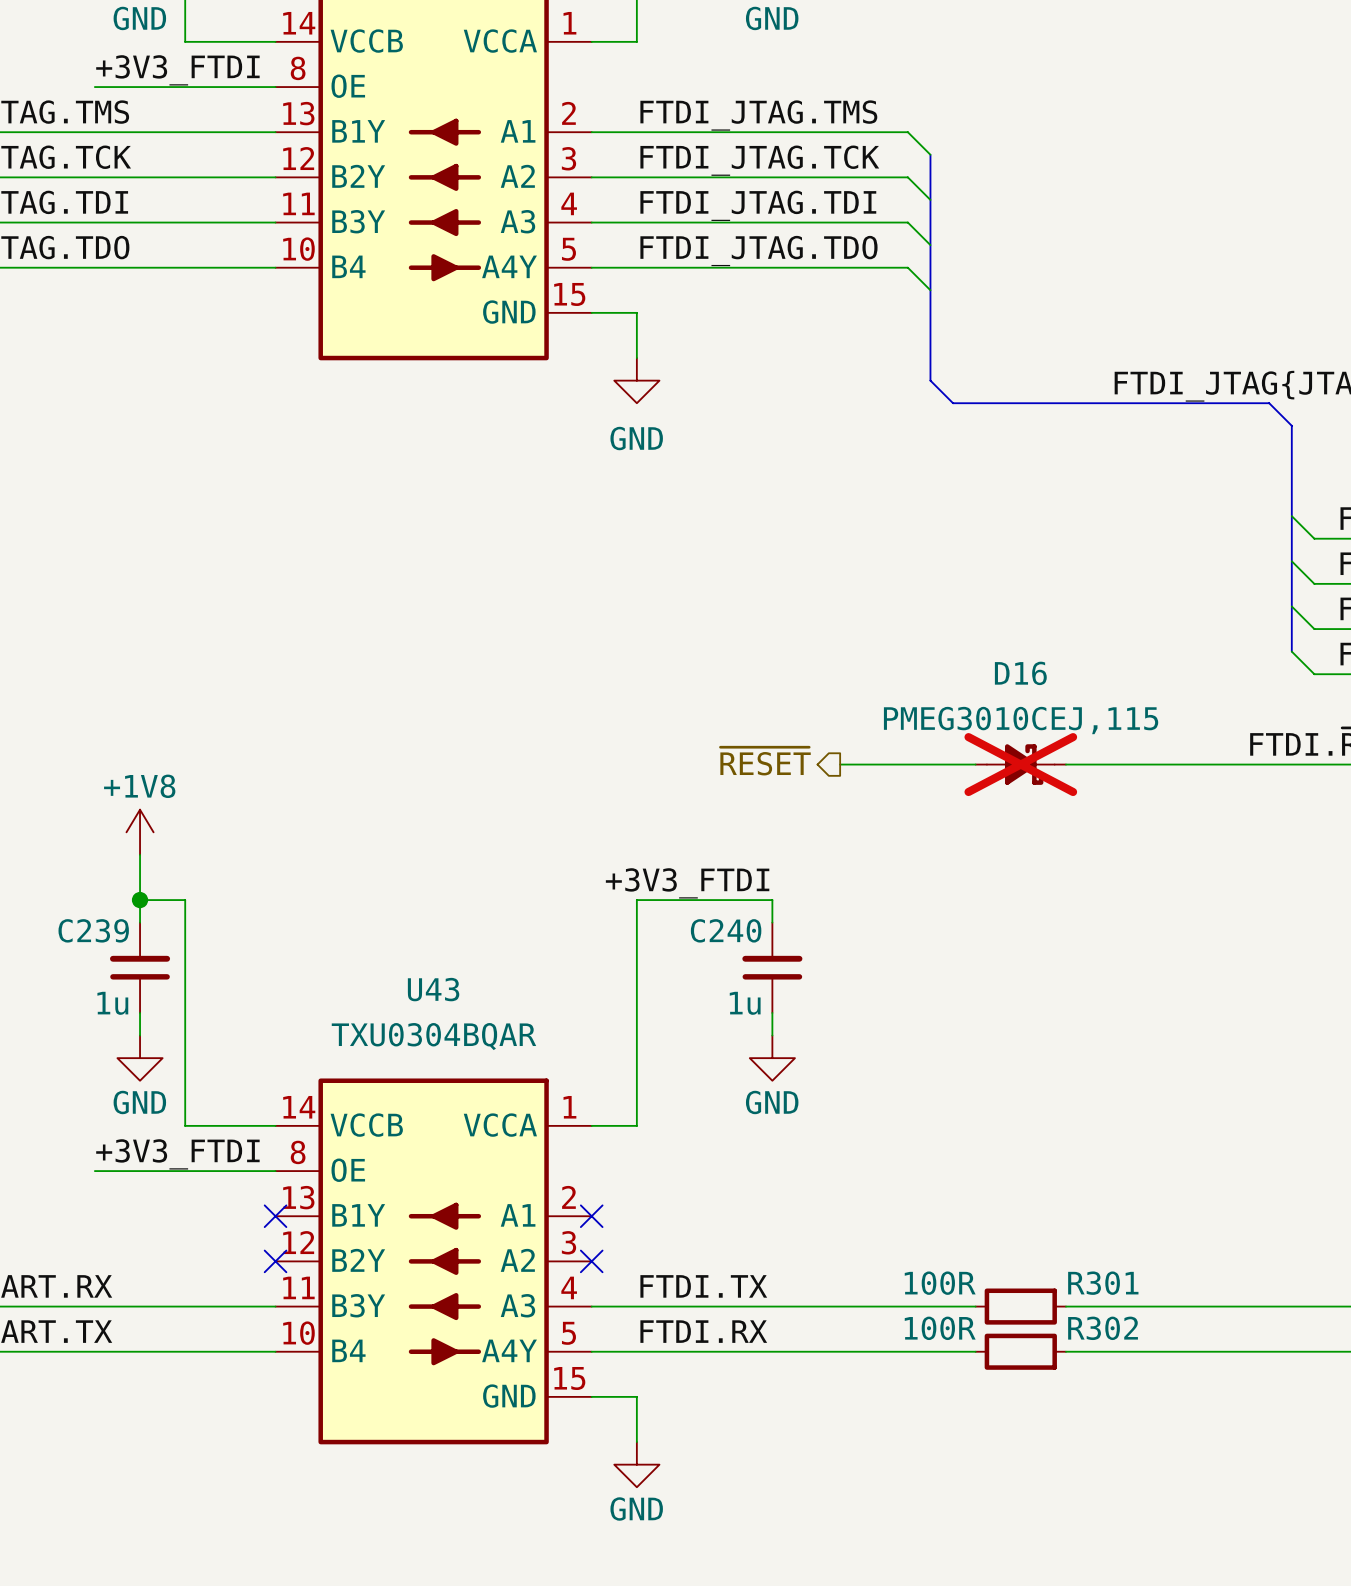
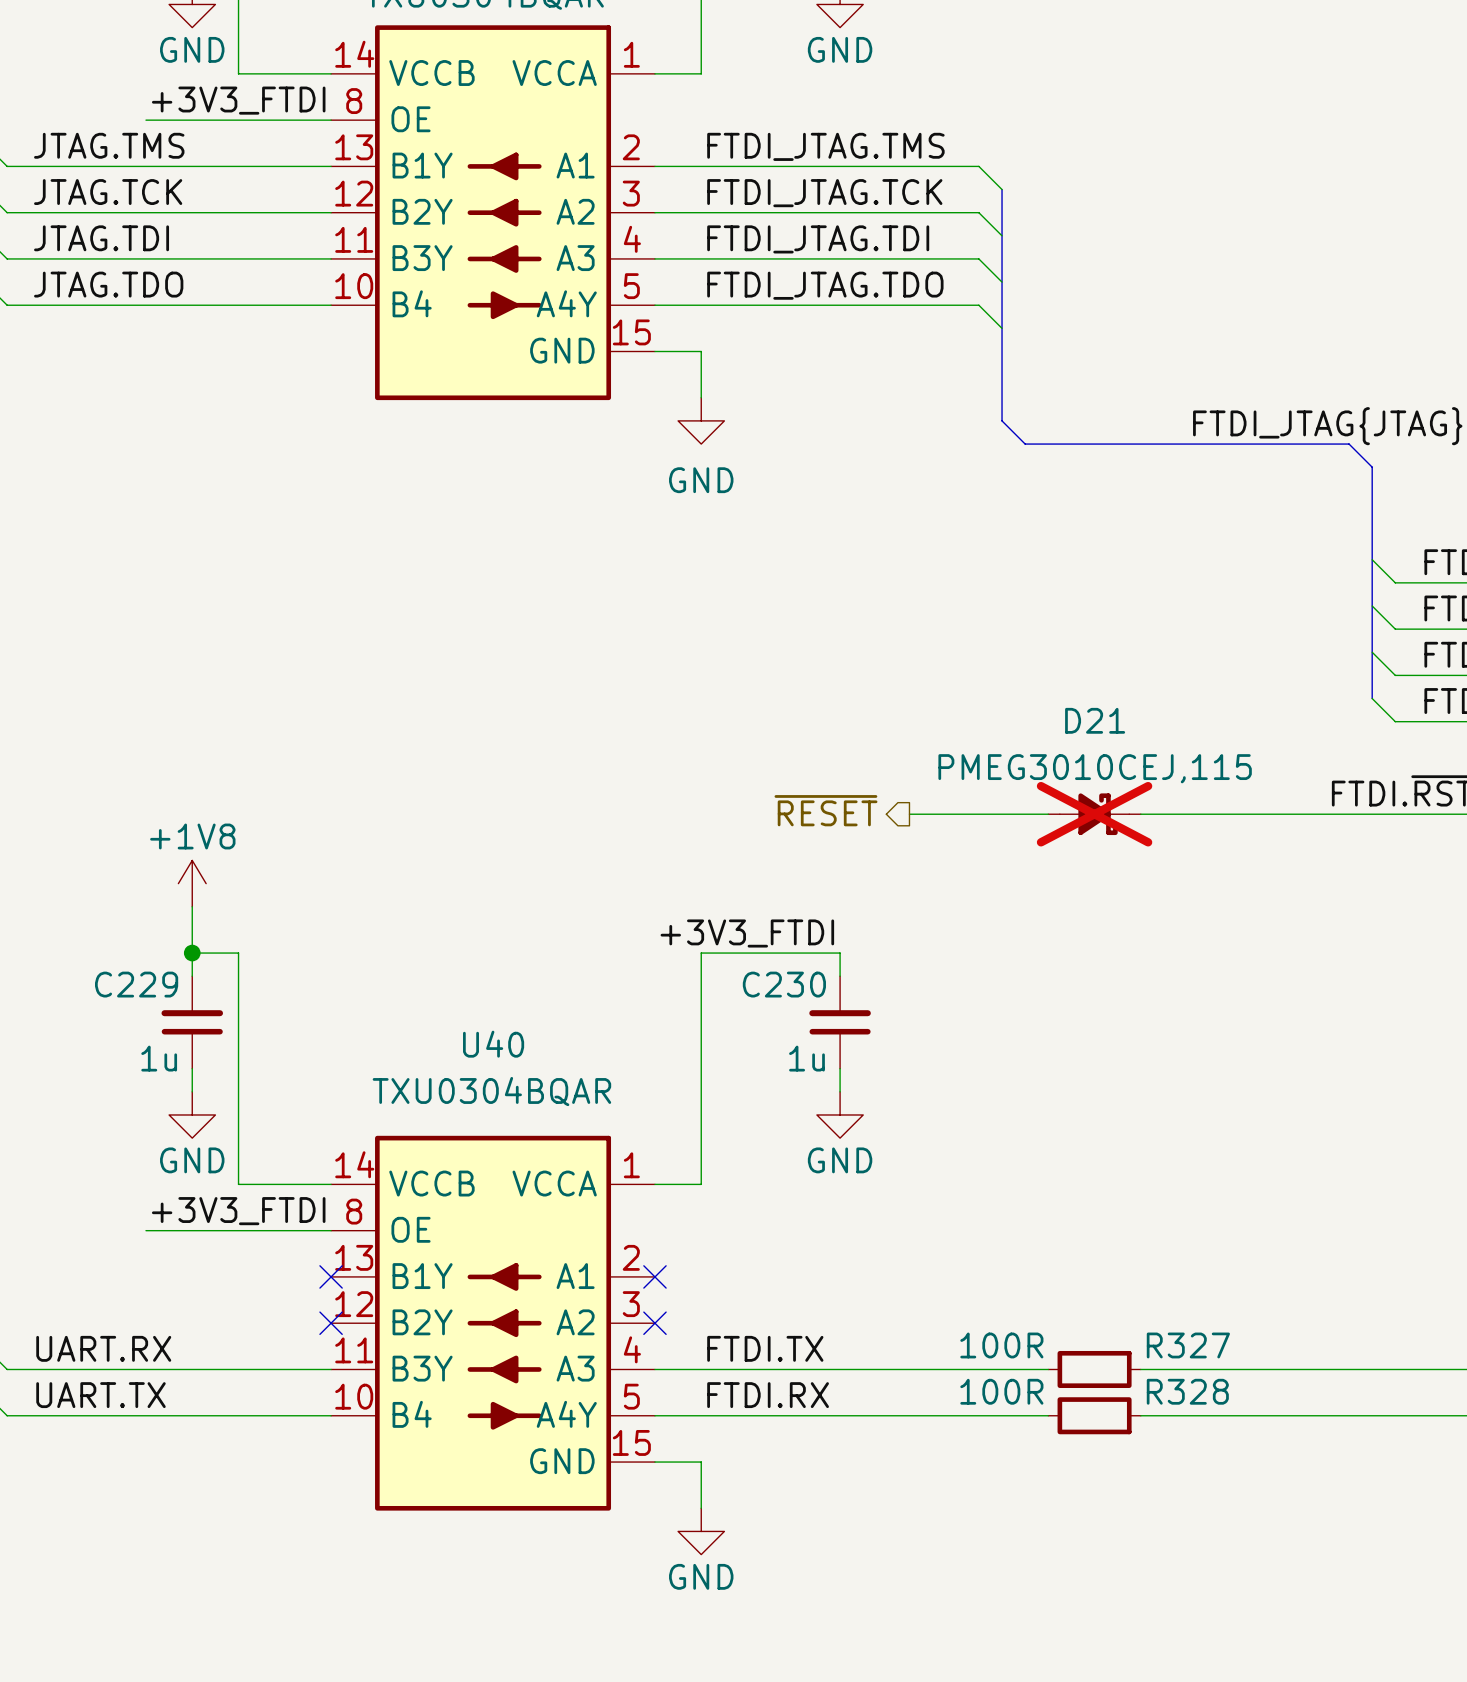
D16 name: D16 (1020, 673) -> D21 (1095, 720)
C239 name: C239 (93, 930) -> C229 (136, 984)
C240 name: C240 (726, 930) -> C230 (784, 984)
U43 name: U43 (433, 989) -> U40 (493, 1044)
R301 name: R301 (1103, 1283) -> R327 (1188, 1345)
R302 name: R302 (1103, 1328) -> R328 (1187, 1391)

